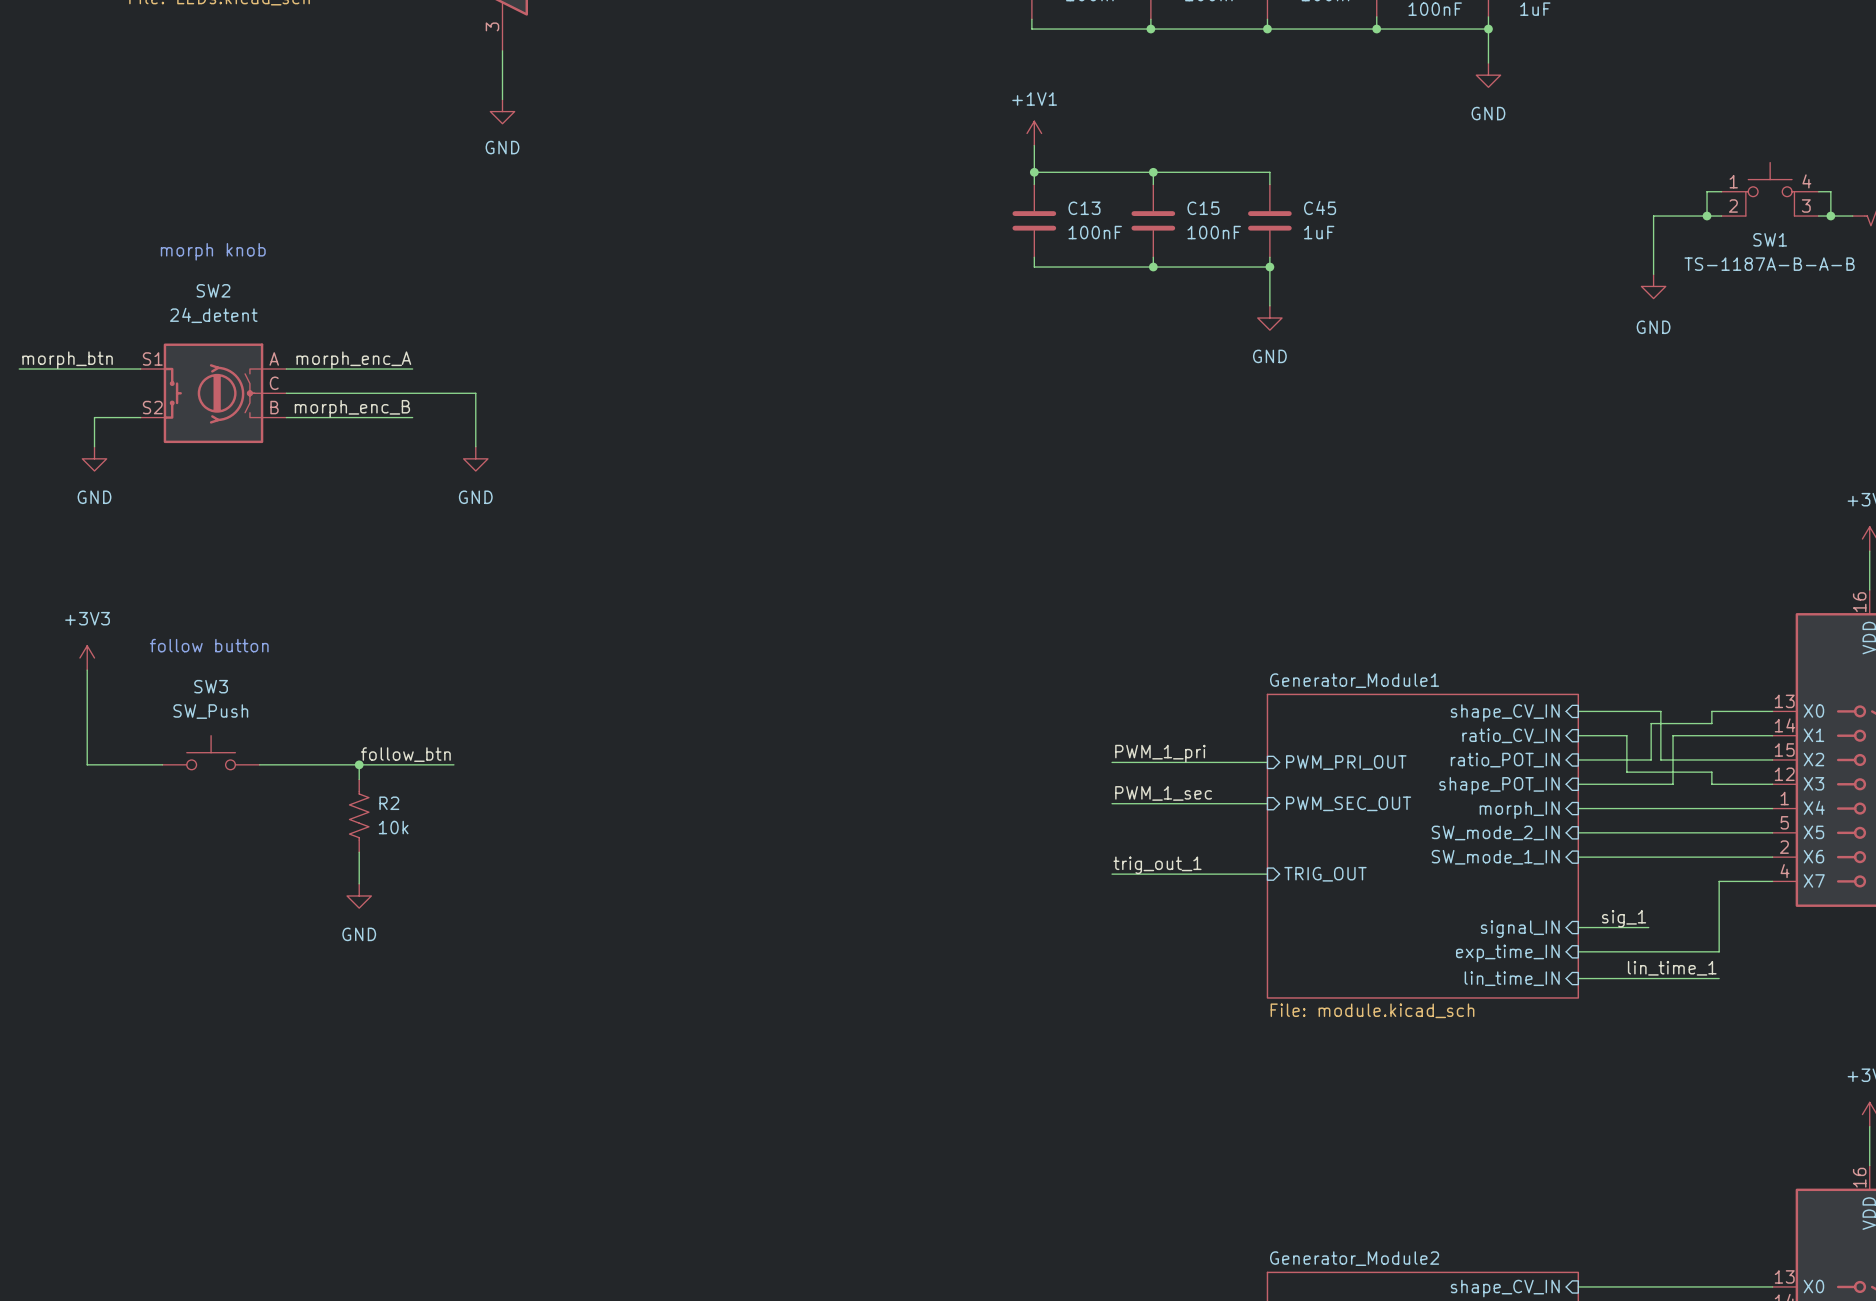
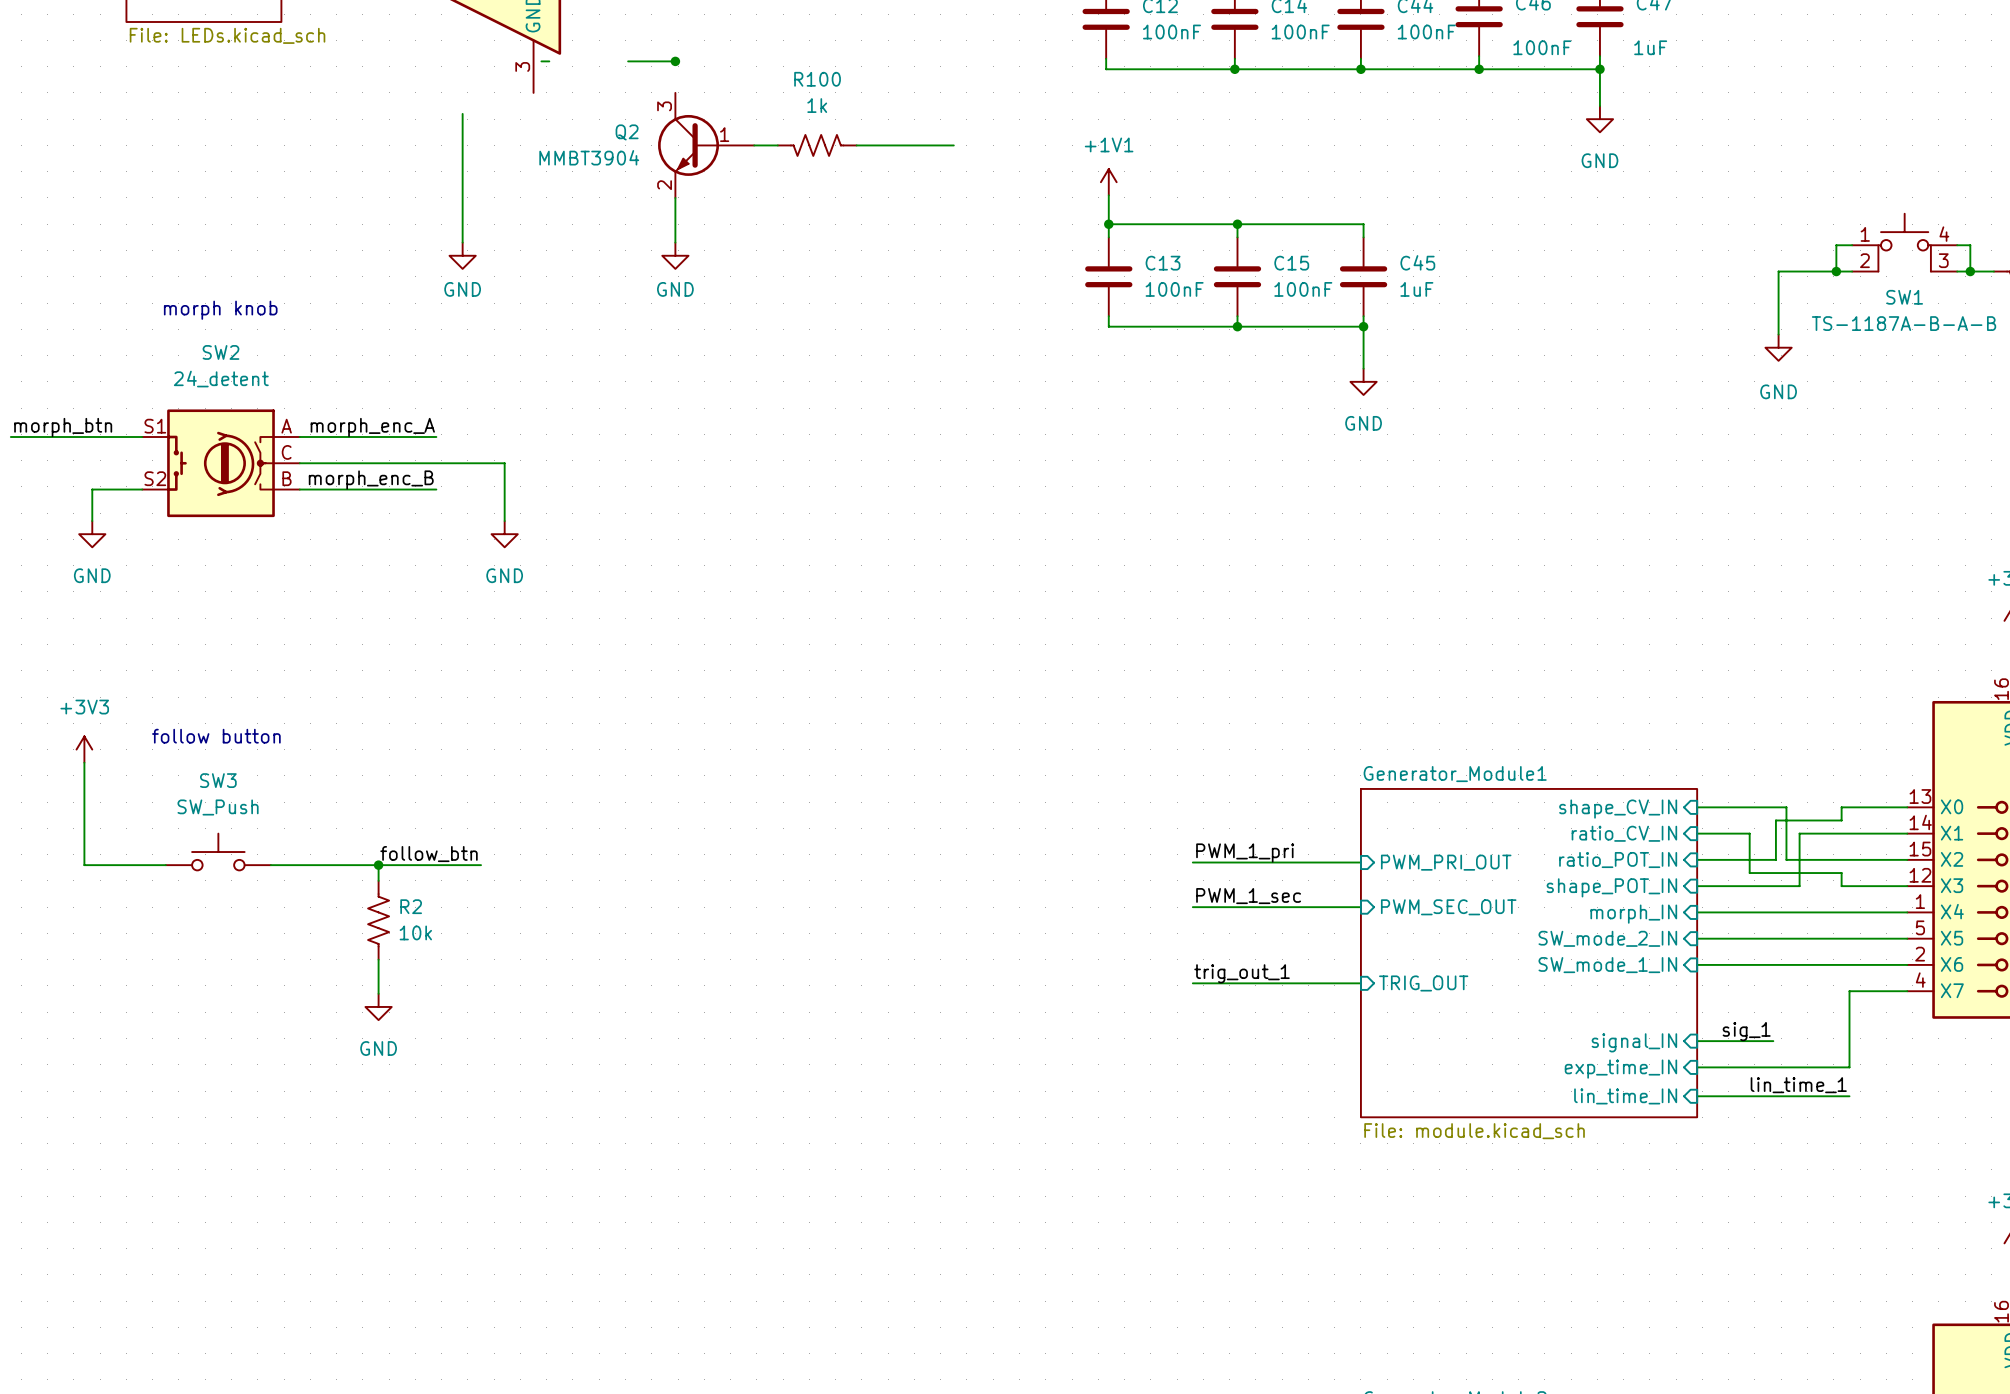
wire: none -> (541, 61) (549, 61)
wire: none -> (628, 61) (675, 61)
junction: none -> (675, 61)
wire: (502, 50) (502, 99) -> none
wire: none -> (462, 113) (462, 242)
Q2: none -> MMBT3904 (706, 145)
wire: none -> (754, 145) (777, 145)
R100: none -> 1k (817, 145)
wire: none -> (856, 145) (953, 145)
power symbol: GND (502, 111) -> none
wire: none -> (675, 197) (675, 242)
power symbol: none -> GND (462, 255)
power symbol: none -> GND (675, 255)

